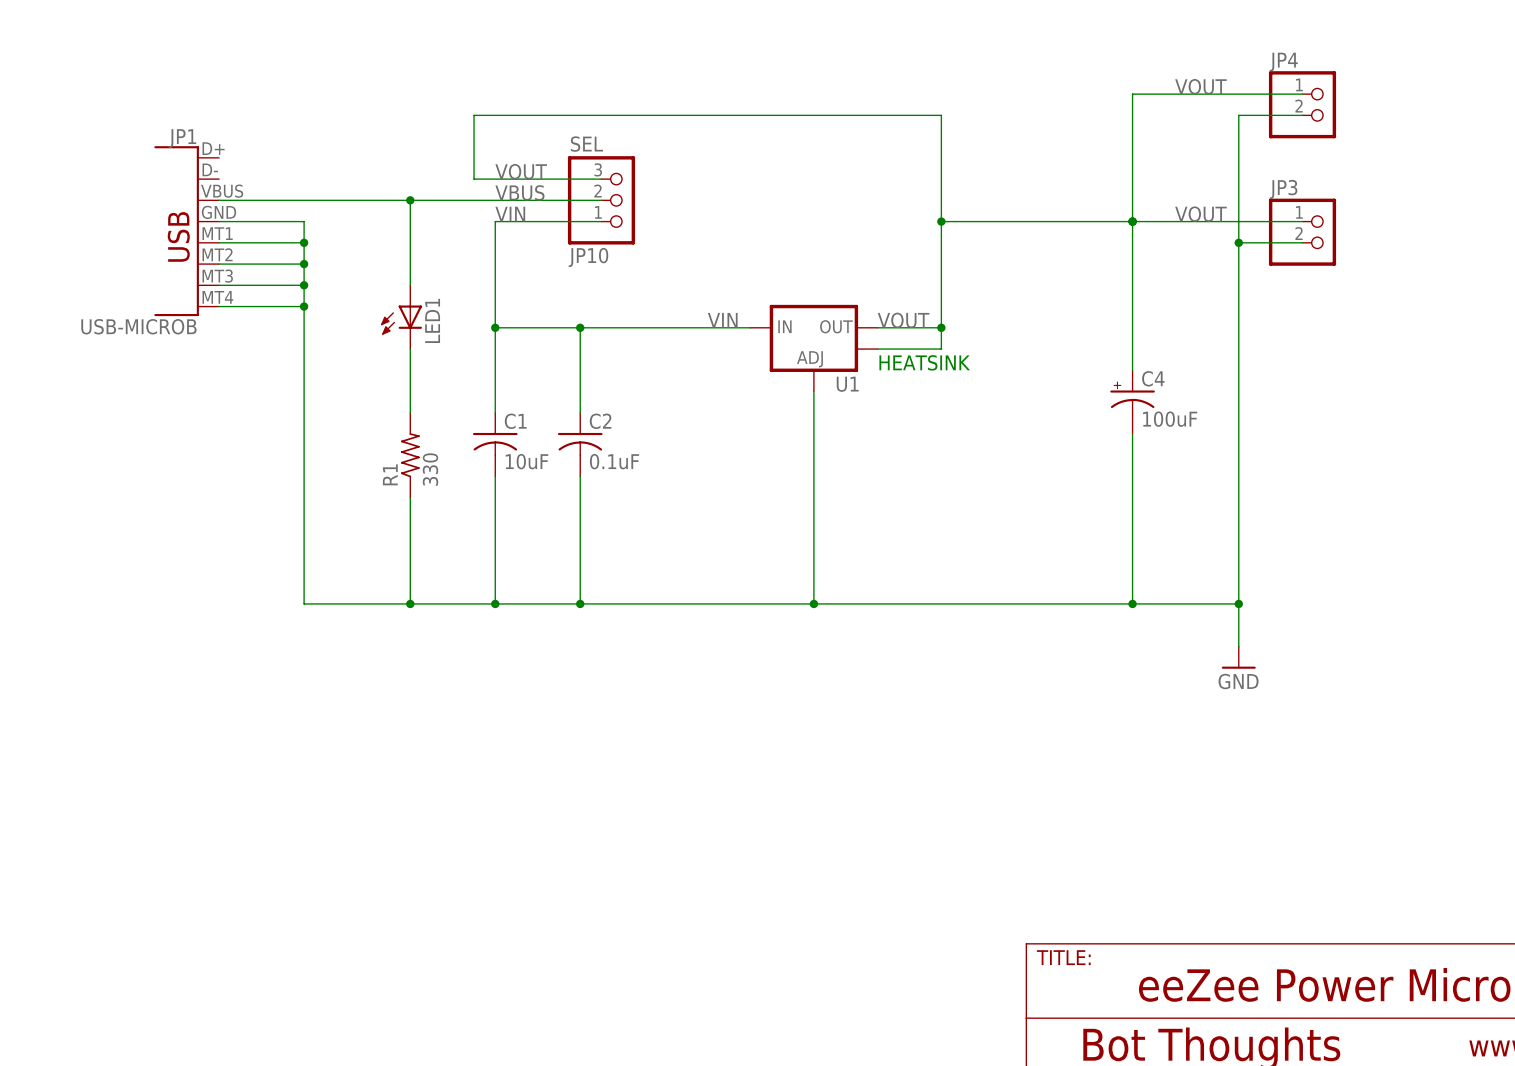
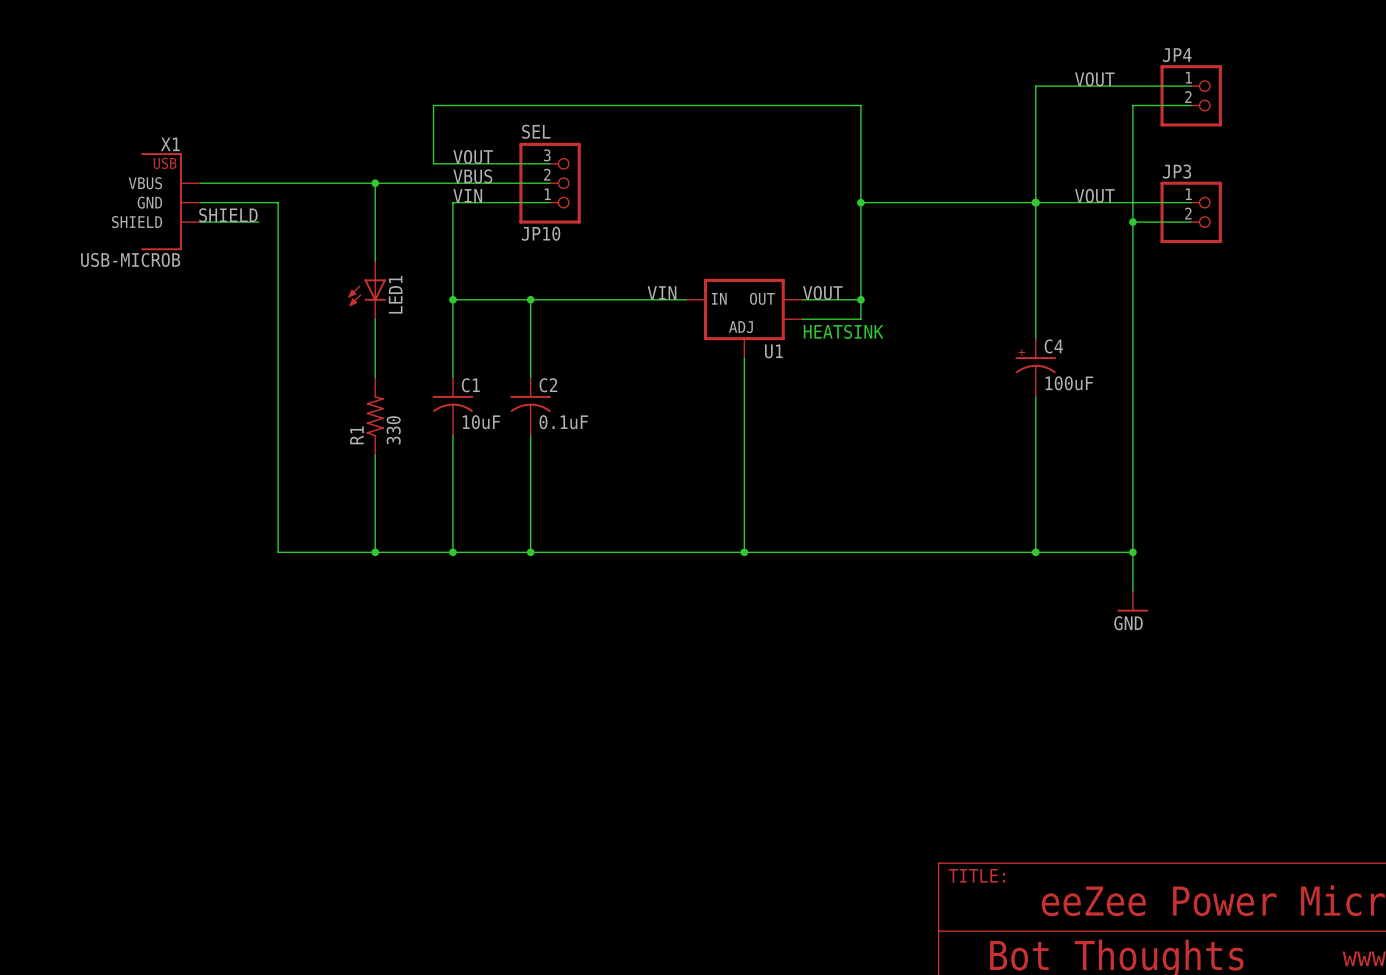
X1: none -> USB-MICROB (170, 201)
JP1: USB-MICROB (186, 231) -> none
label: none -> SHIELD (228, 215)
wire: (282, 242) (304, 242) -> none
junction: (304, 242) -> none
wire: (219, 264) (304, 264) -> none
junction: (304, 264) -> none
wire: (219, 285) (304, 285) -> none
junction: (304, 285) -> none
wire: (219, 306) (304, 306) -> none
junction: (304, 306) -> none

